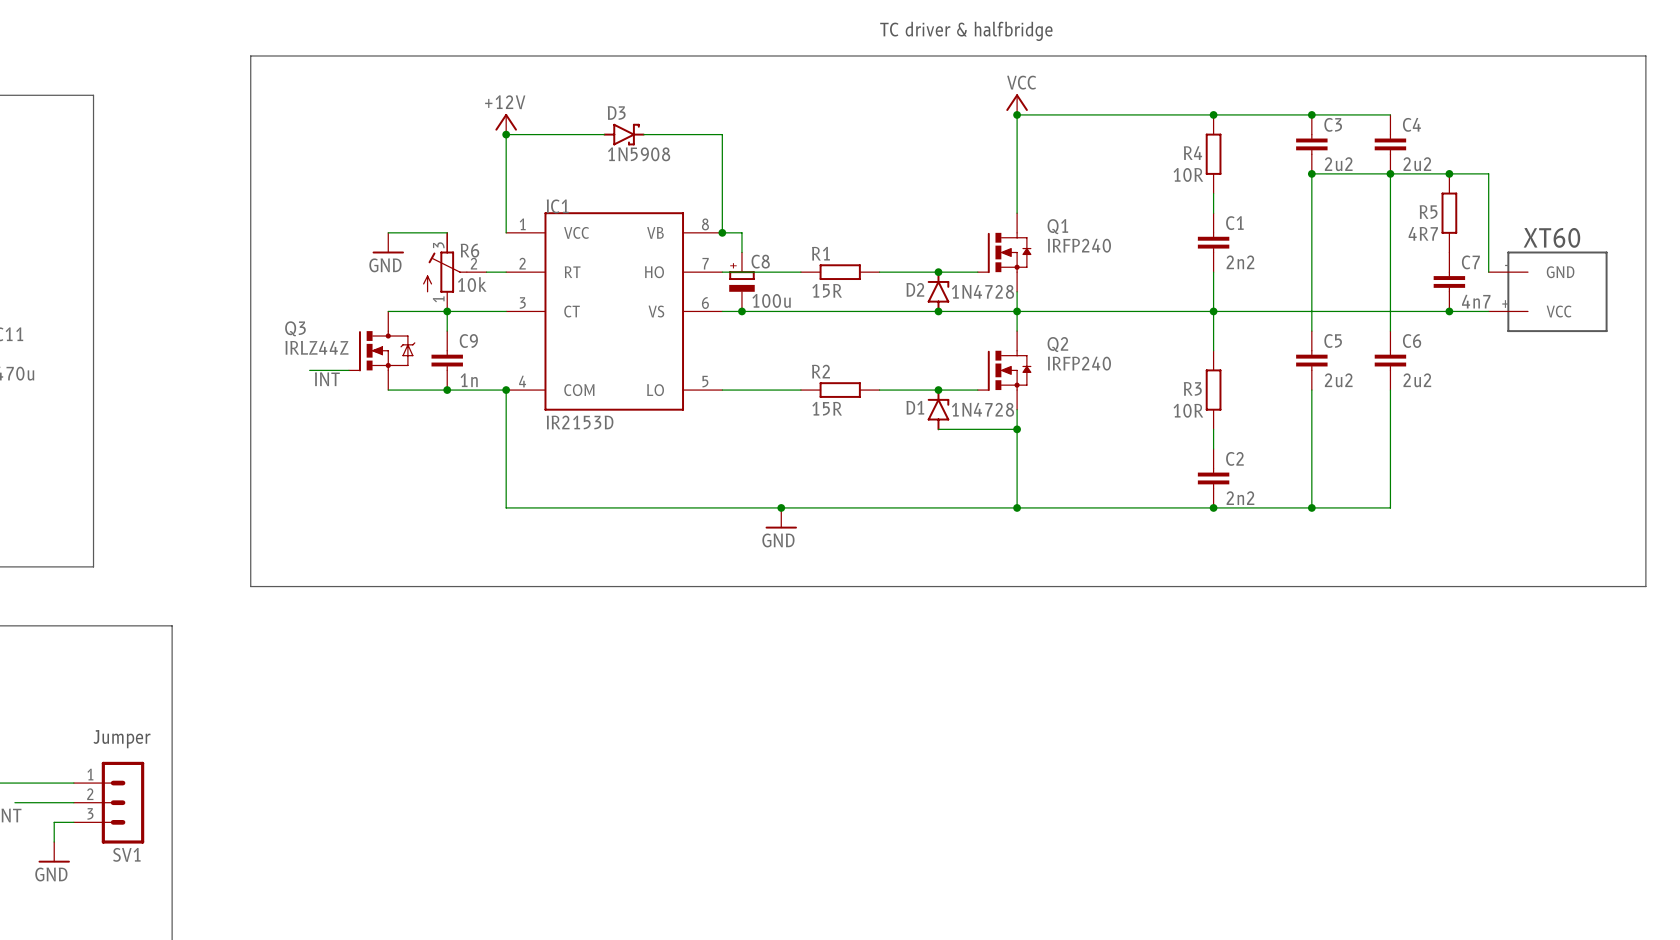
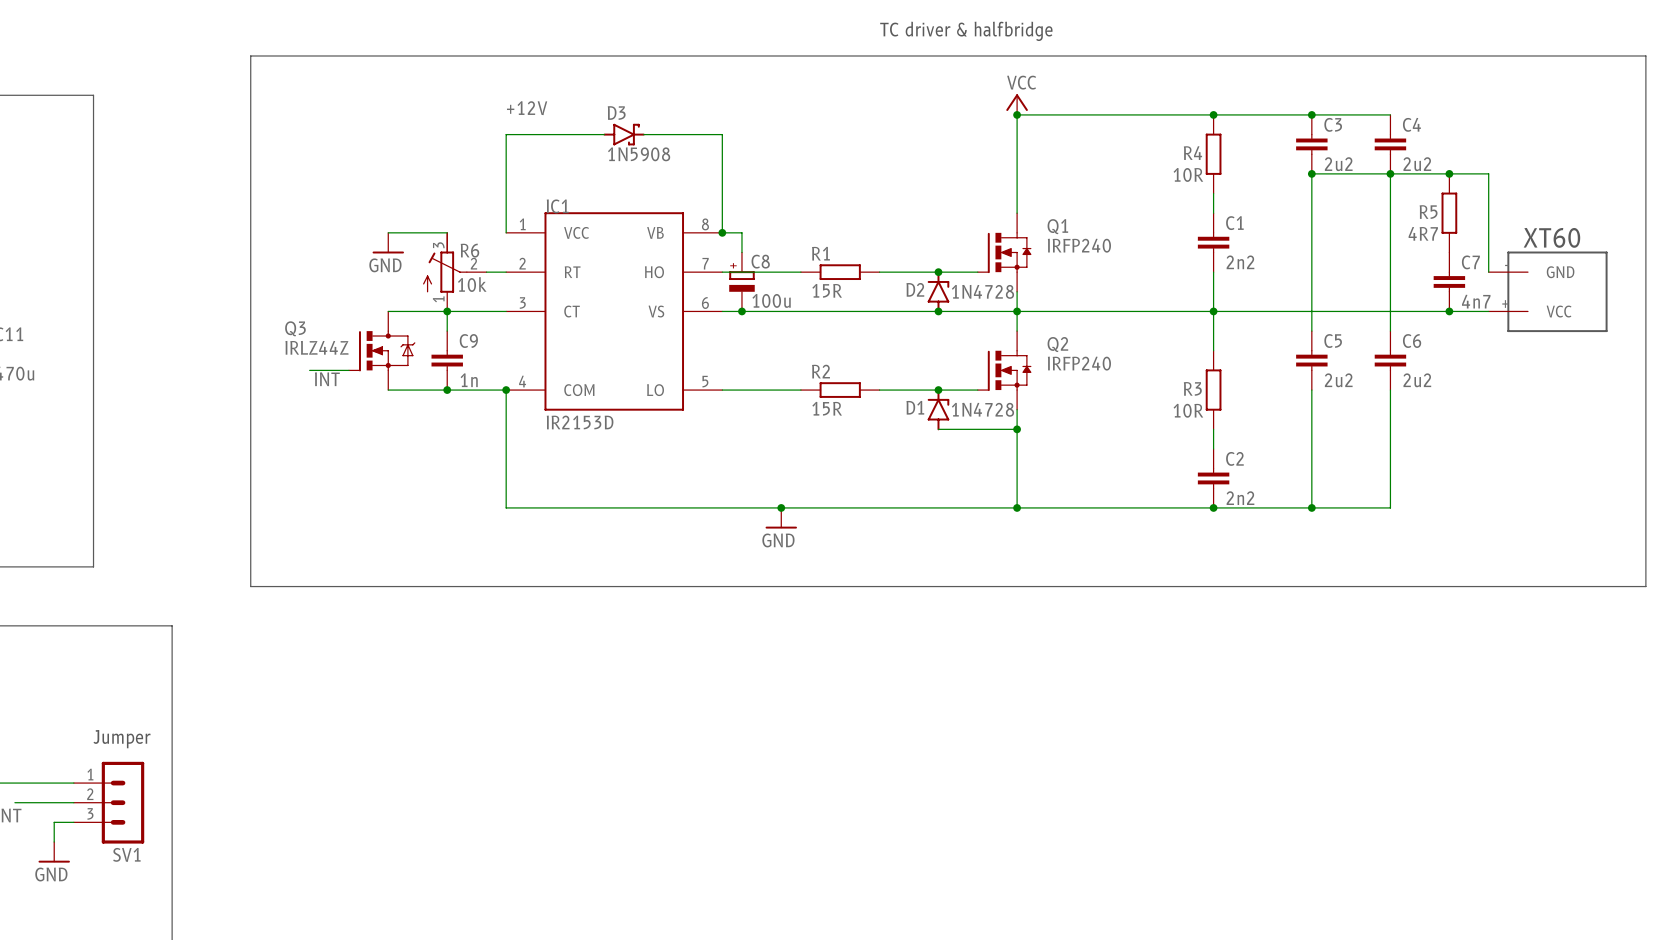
label: none -> +12V (527, 108)
power symbol: +12V (506, 124) -> none
junction: (506, 134) -> none

